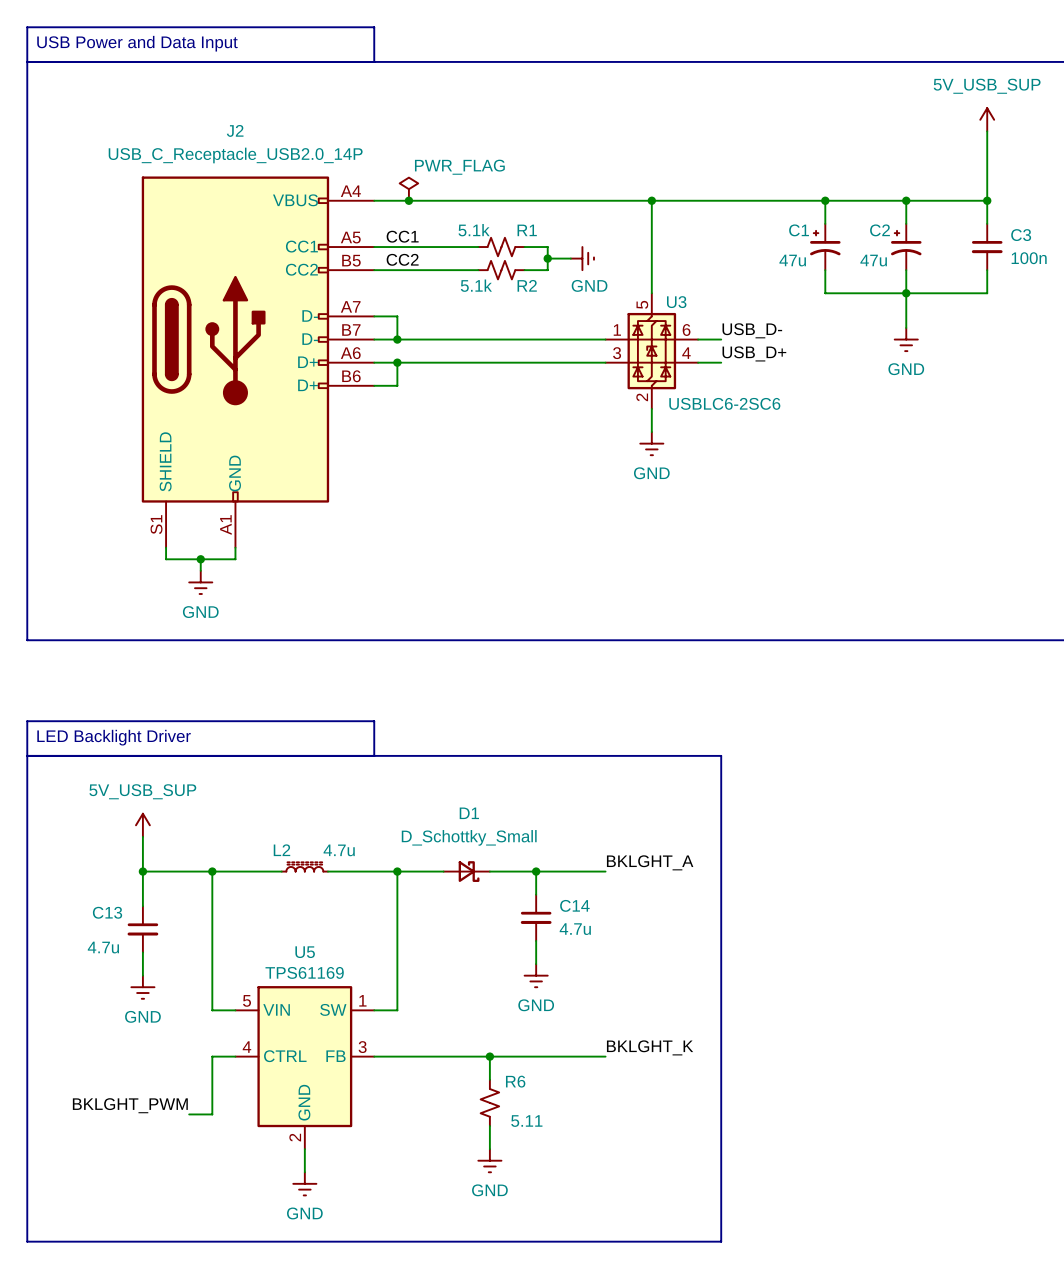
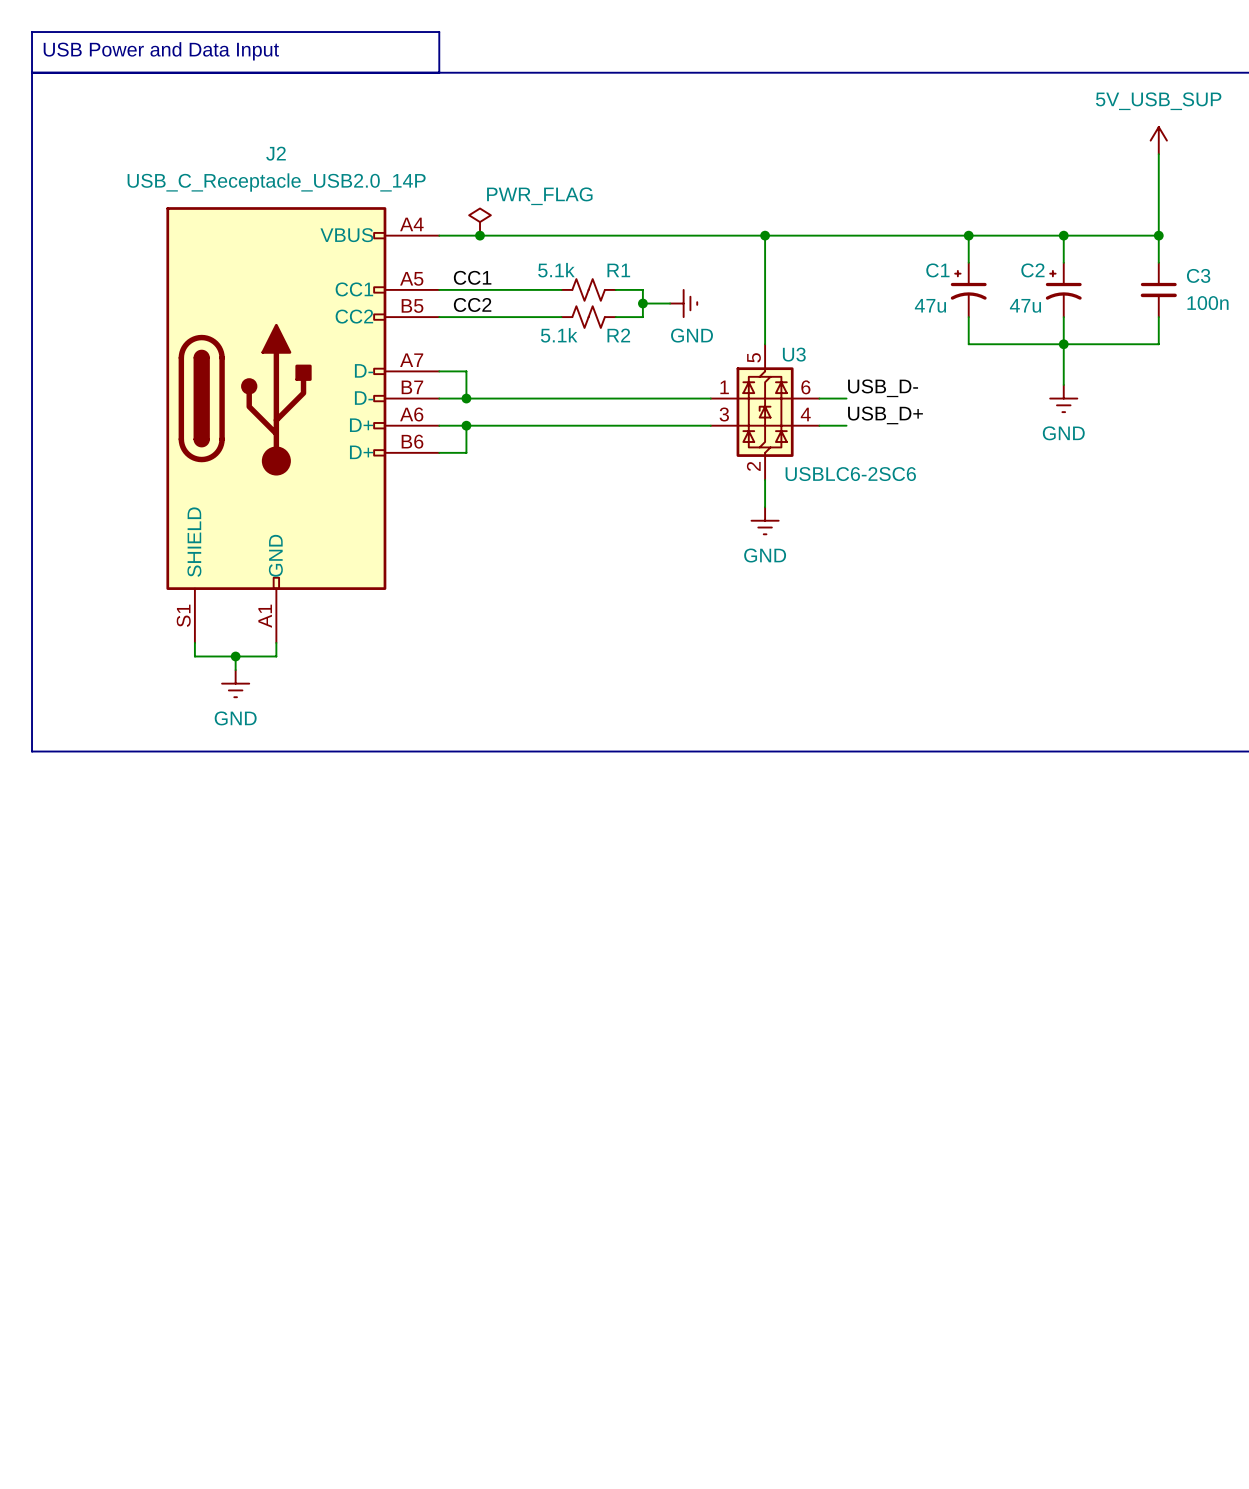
text: LED Backlight Driver (114, 737) -> none
line: (27, 755) (721, 755) (721, 1241) (27, 1241) (27, 721) (374, 721) (374, 755) -> none
power symbol: 5V_USB_SUP (142, 825) -> none
wire: (142, 836) (142, 906) -> none
label: BKLGHT_A (650, 862) -> none
L2: 4.7u (304, 866) -> none
wire: (142, 871) (281, 871) -> none
junction: (142, 871) -> none
wire: (212, 871) (212, 1010) (235, 1010) -> none
junction: (212, 871) -> none
wire: (327, 871) (443, 871) -> none
wire: (397, 871) (397, 1010) (374, 1010) -> none
junction: (397, 871) -> none
D1: D_Schottky_Small (466, 871) -> none
wire: (489, 871) (605, 871) -> none
wire: (536, 871) (536, 894) -> none
junction: (536, 871) -> none
C14: 4.7u (536, 917) -> none
C13: 4.7u (142, 929) -> none
wire: (536, 940) (536, 964) -> none
wire: (142, 952) (142, 975) -> none
power symbol: GND (536, 975) -> none
power symbol: GND (142, 987) -> none
label: BKLGHT_K (650, 1047) -> none
wire: (235, 1056) (212, 1056) (212, 1114) (189, 1114) -> none
wire: (374, 1056) (605, 1056) -> none
wire: (489, 1056) (489, 1079) -> none
junction: (489, 1056) -> none
U5: TPS61169 (304, 1067) -> none
R6: 5.11 (489, 1102) -> none
label: BKLGHT_PWM (130, 1105) -> none
wire: (489, 1126) (489, 1149) -> none
wire: (304, 1149) (304, 1172) -> none
power symbol: GND (489, 1160) -> none
power symbol: GND (304, 1183) -> none

